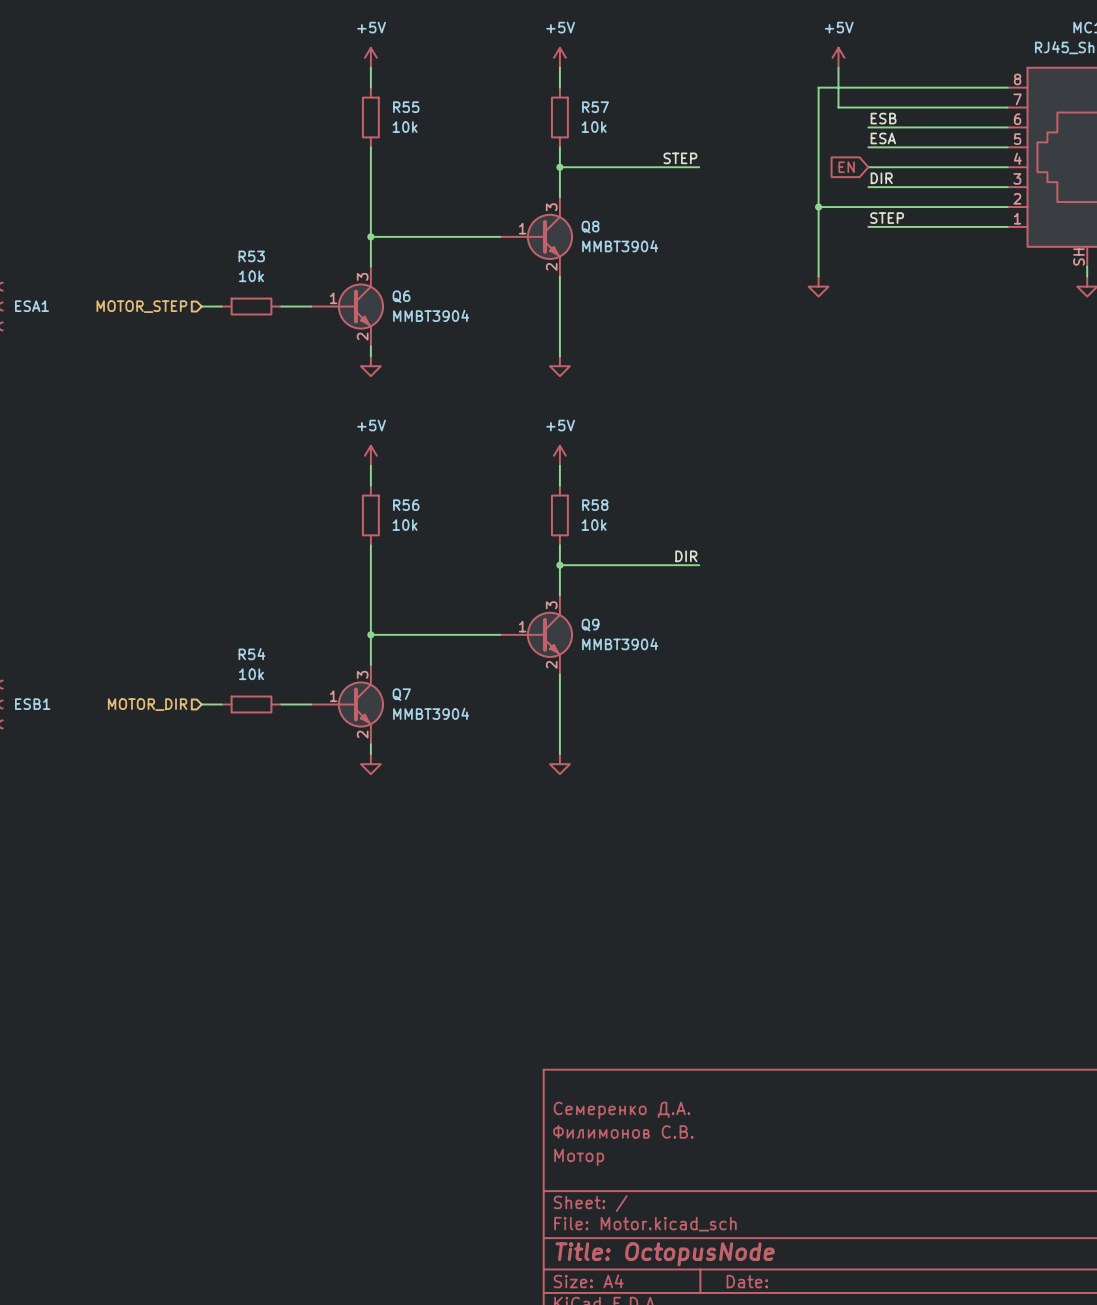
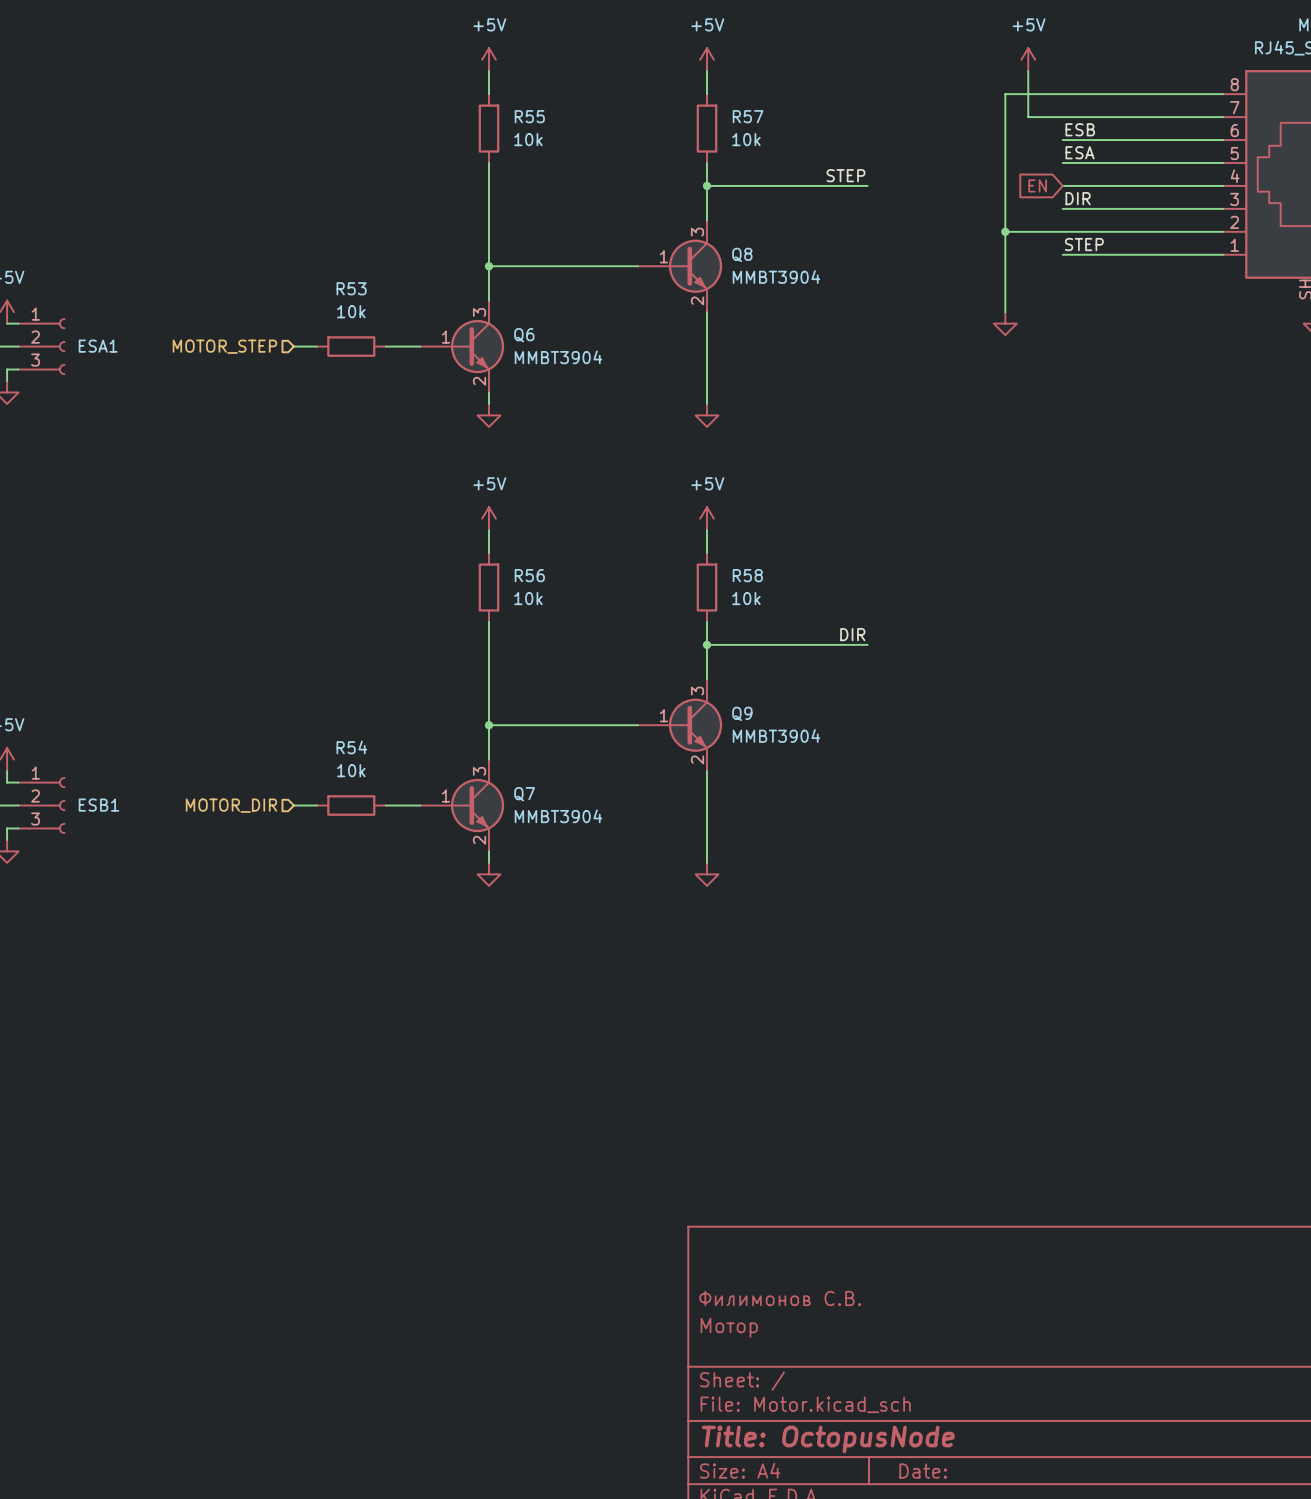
title block: Семеренко Д.А. (621, 1110) -> none

